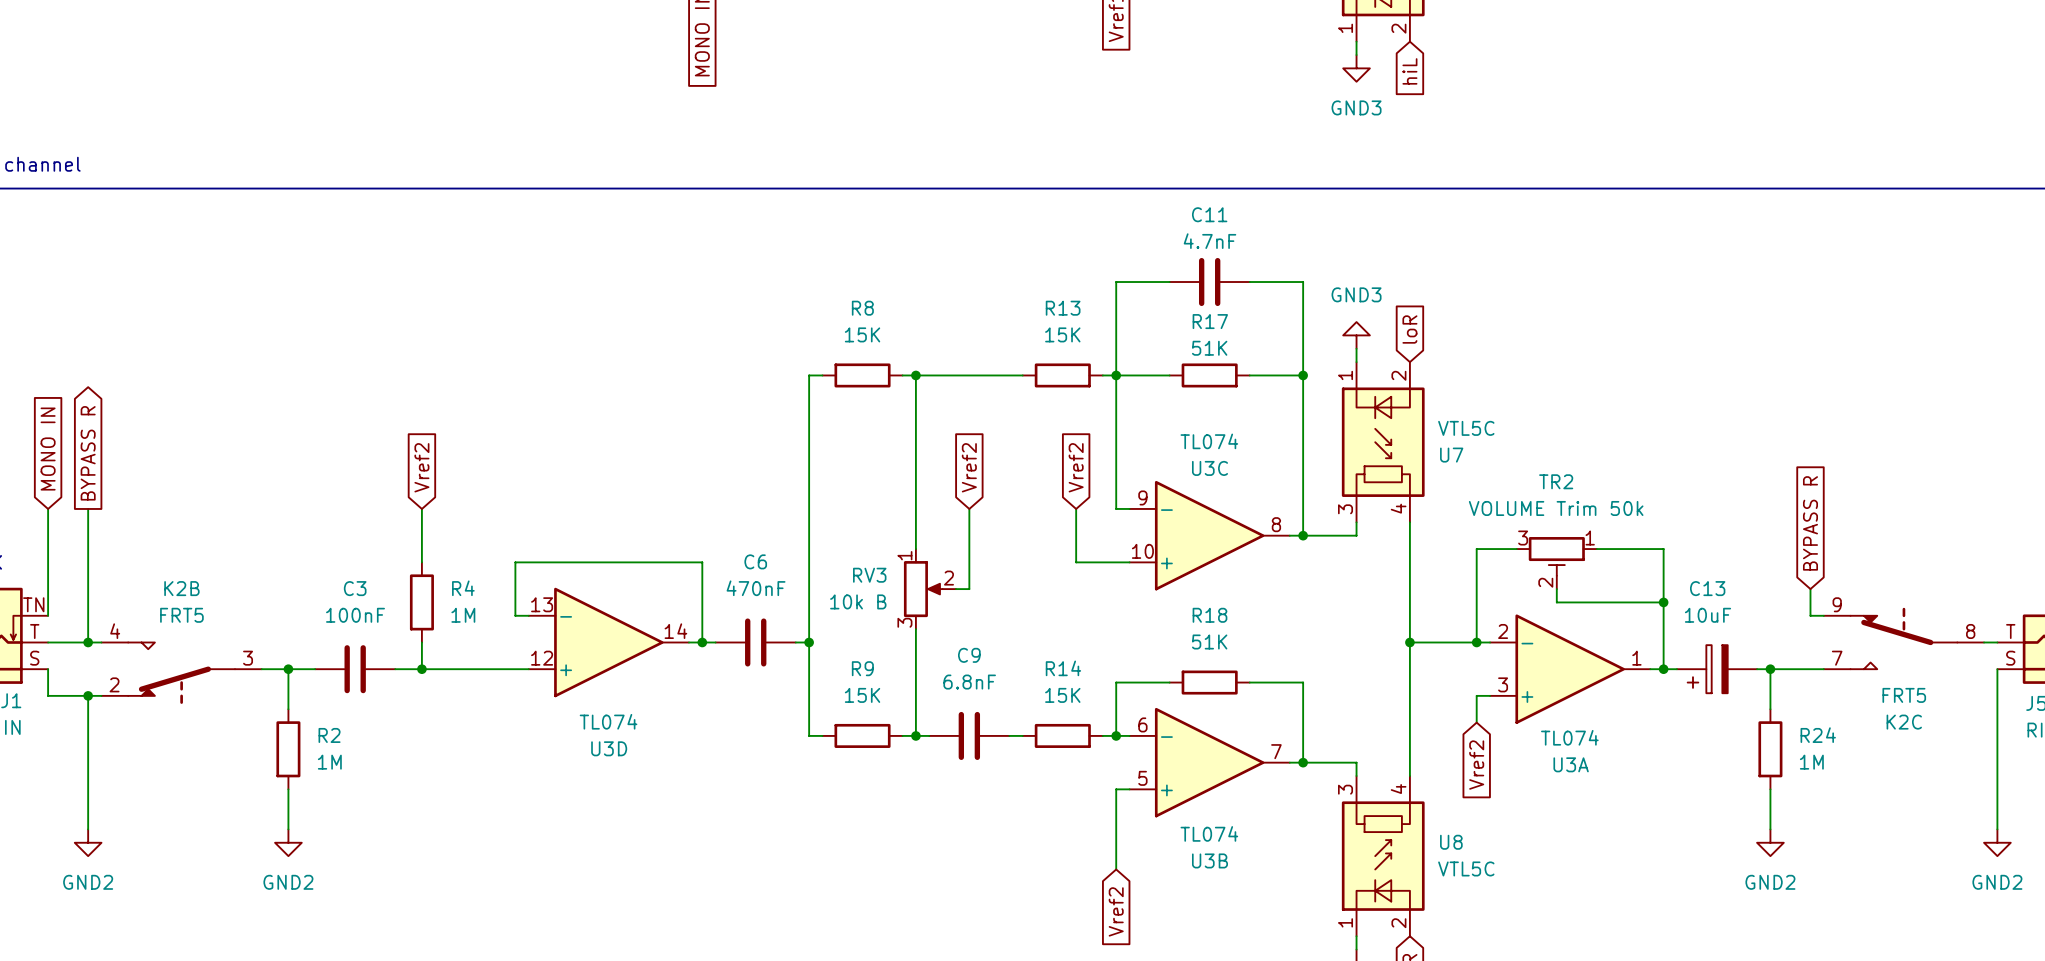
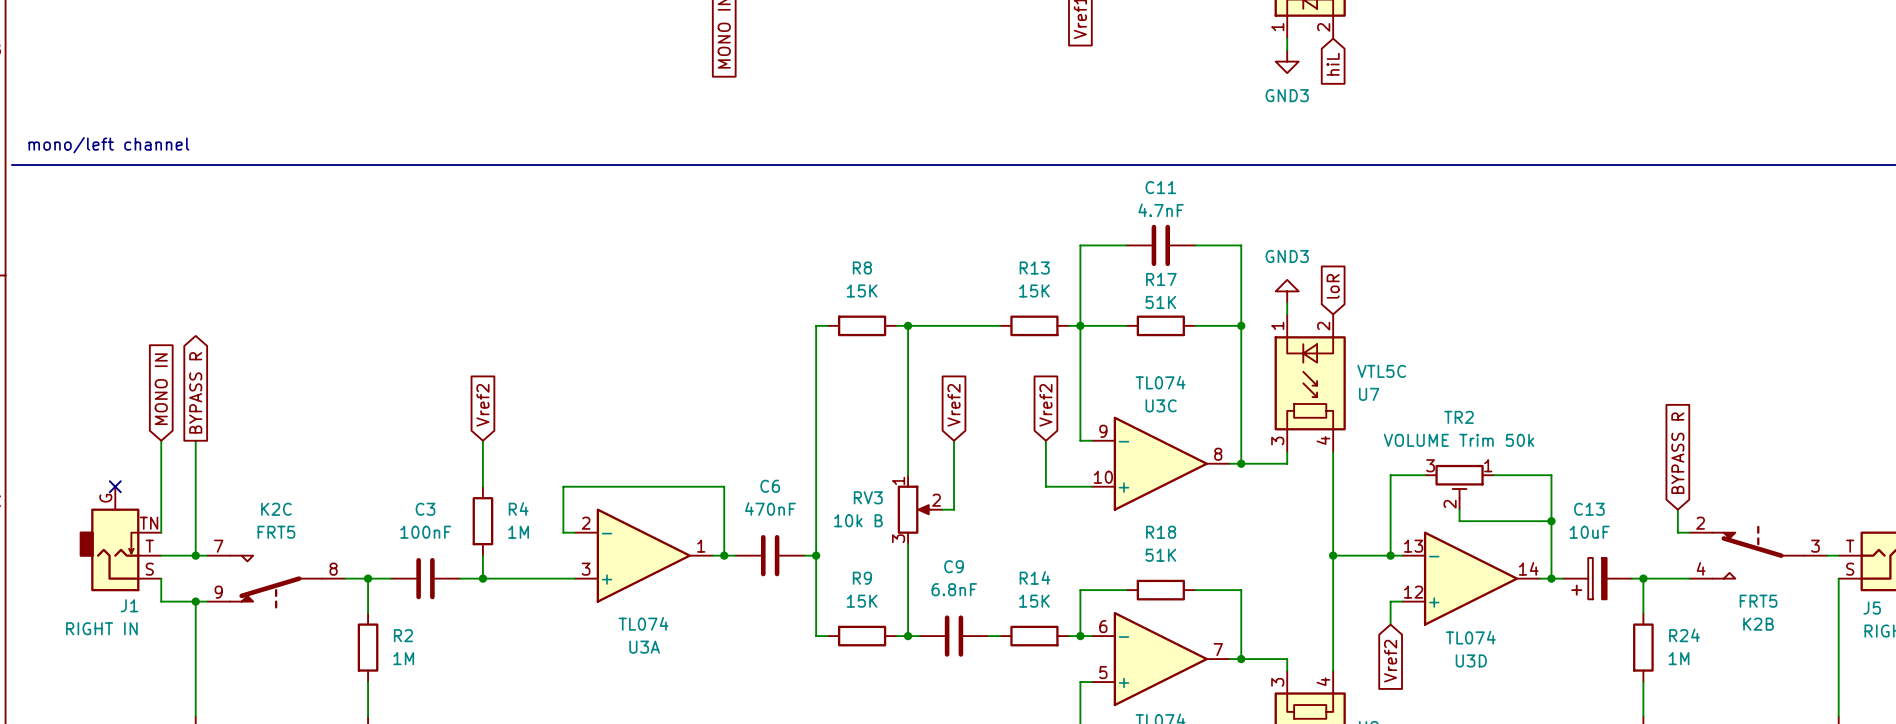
K2C flip: as is (1903, 638) -> up-down (276, 582)
K2C position: (1903, 638) -> (276, 582)
U3D position: (608, 642) -> (1471, 578)
U3A position: (1570, 669) -> (643, 555)
K2B flip: as is (181, 673) -> up-down (1758, 552)
K2B position: (181, 673) -> (1758, 552)
U3D name position: U3D (609, 748) -> U3D (1471, 660)
U3A name position: U3A (1571, 764) -> U3A (644, 647)

